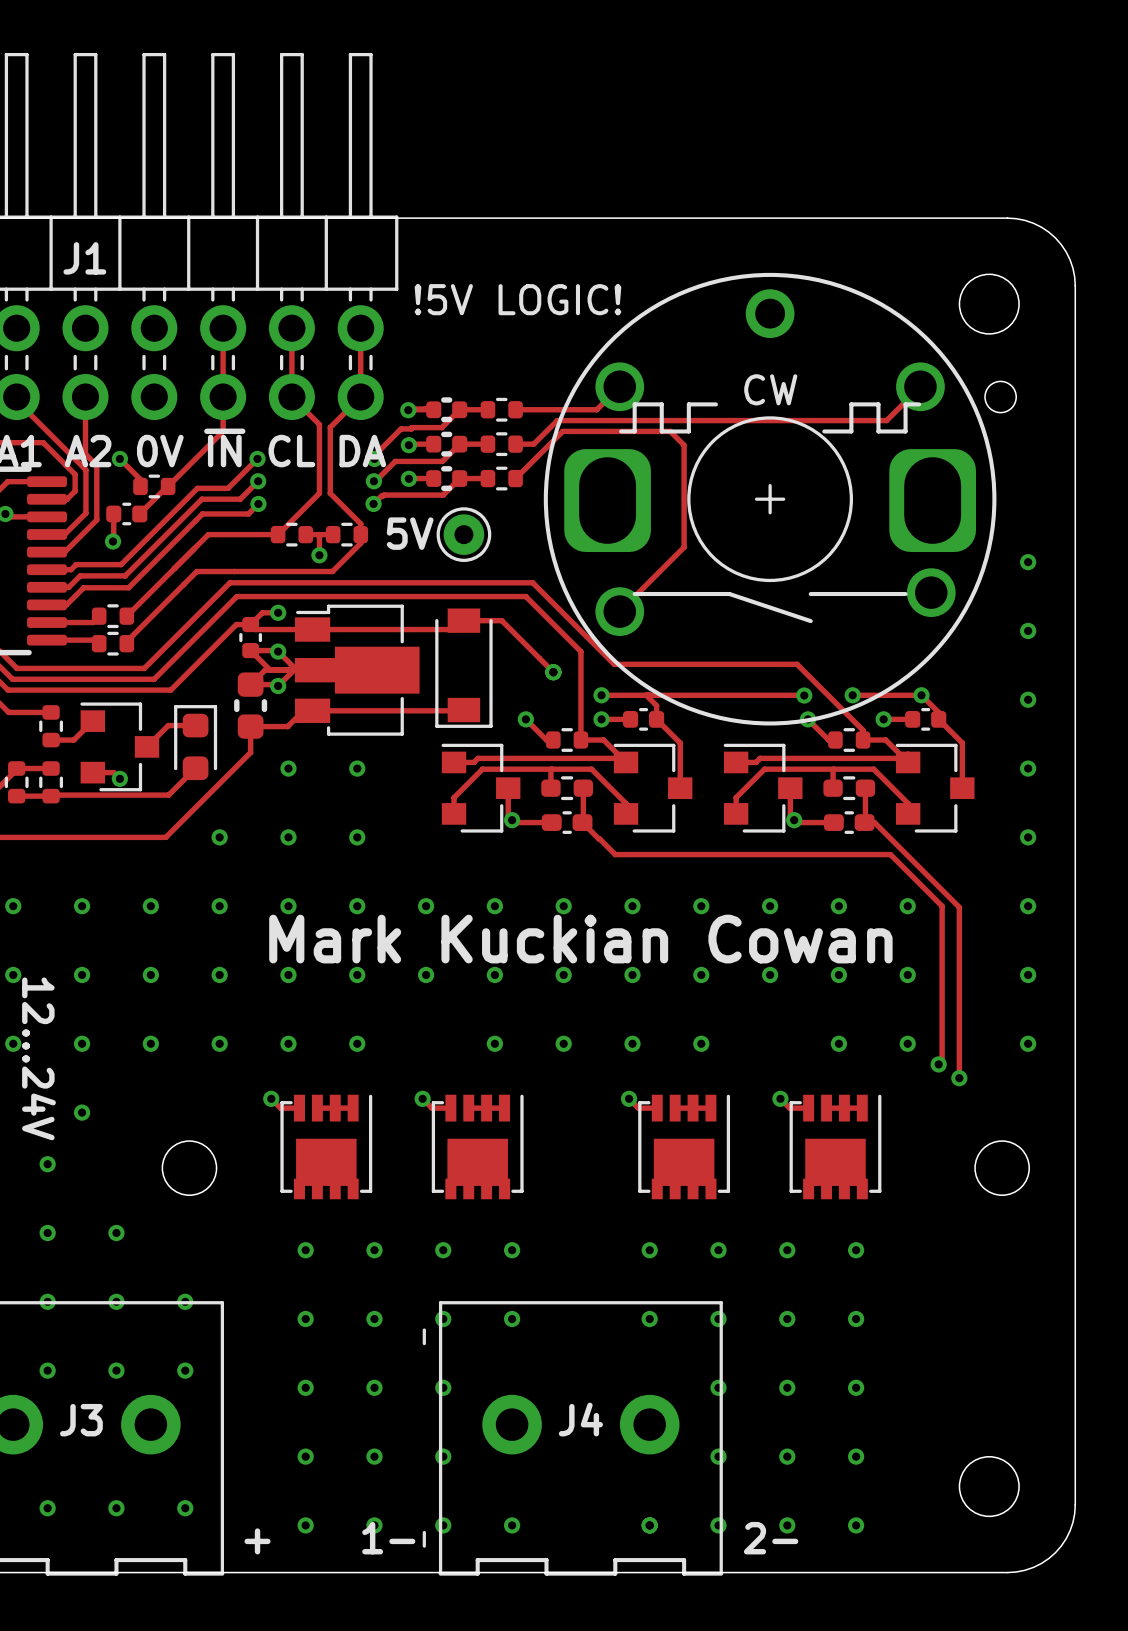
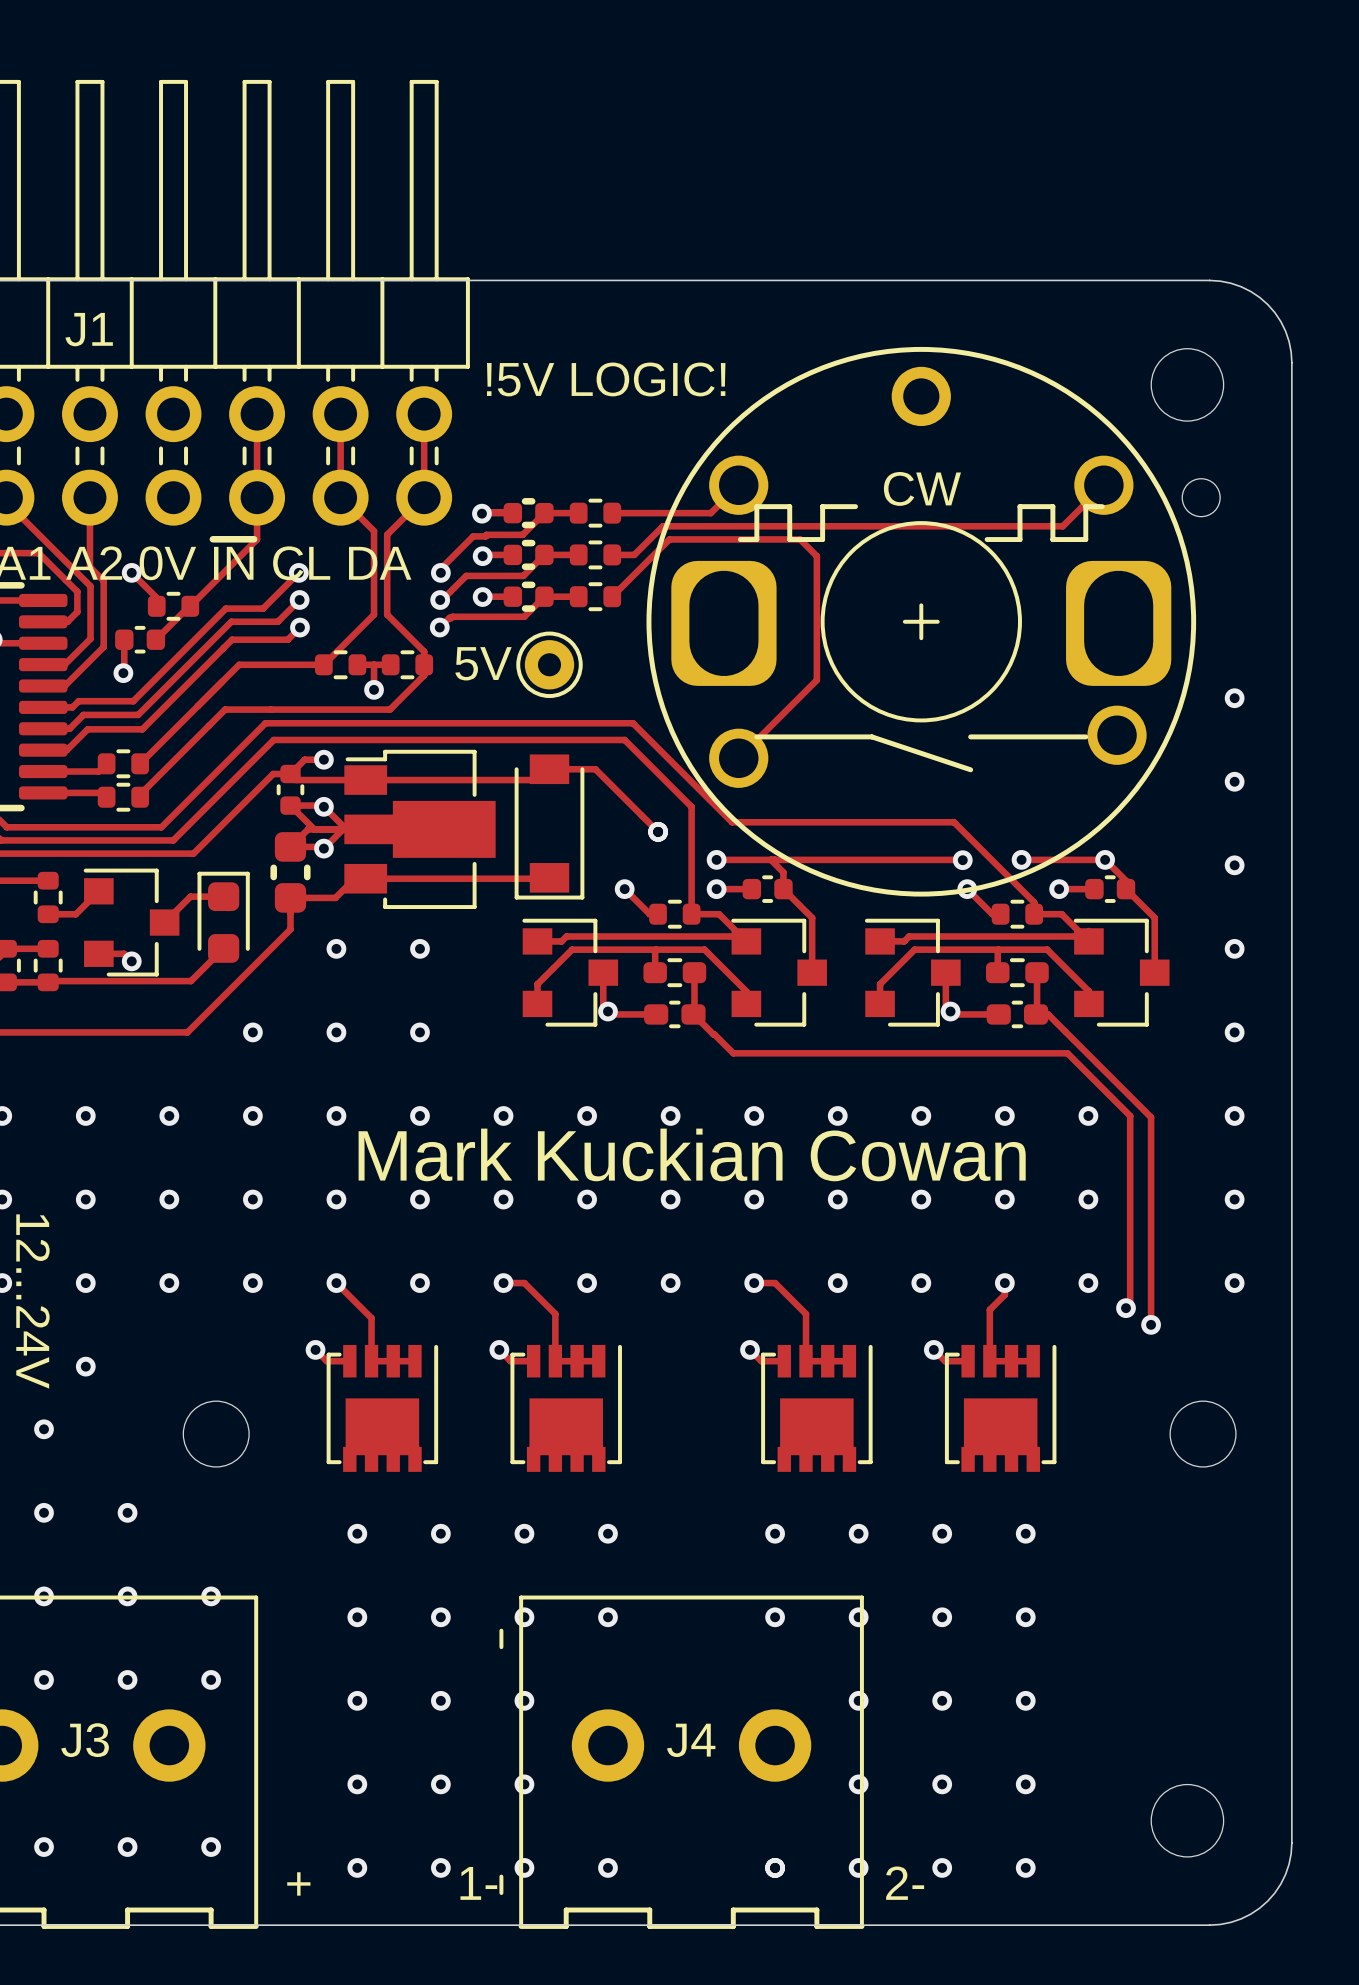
track: none -> (336, 1283) (371, 1318) (371, 1361)
track: none -> (503, 1283) (524, 1283) (555, 1313) (555, 1361)
via: none -> (503, 1283)
track: none -> (754, 1283) (775, 1283) (806, 1313) (806, 1361)
via: none -> (921, 1283)
track: none -> (1004, 1283) (1004, 1294) (989, 1309) (989, 1361)

